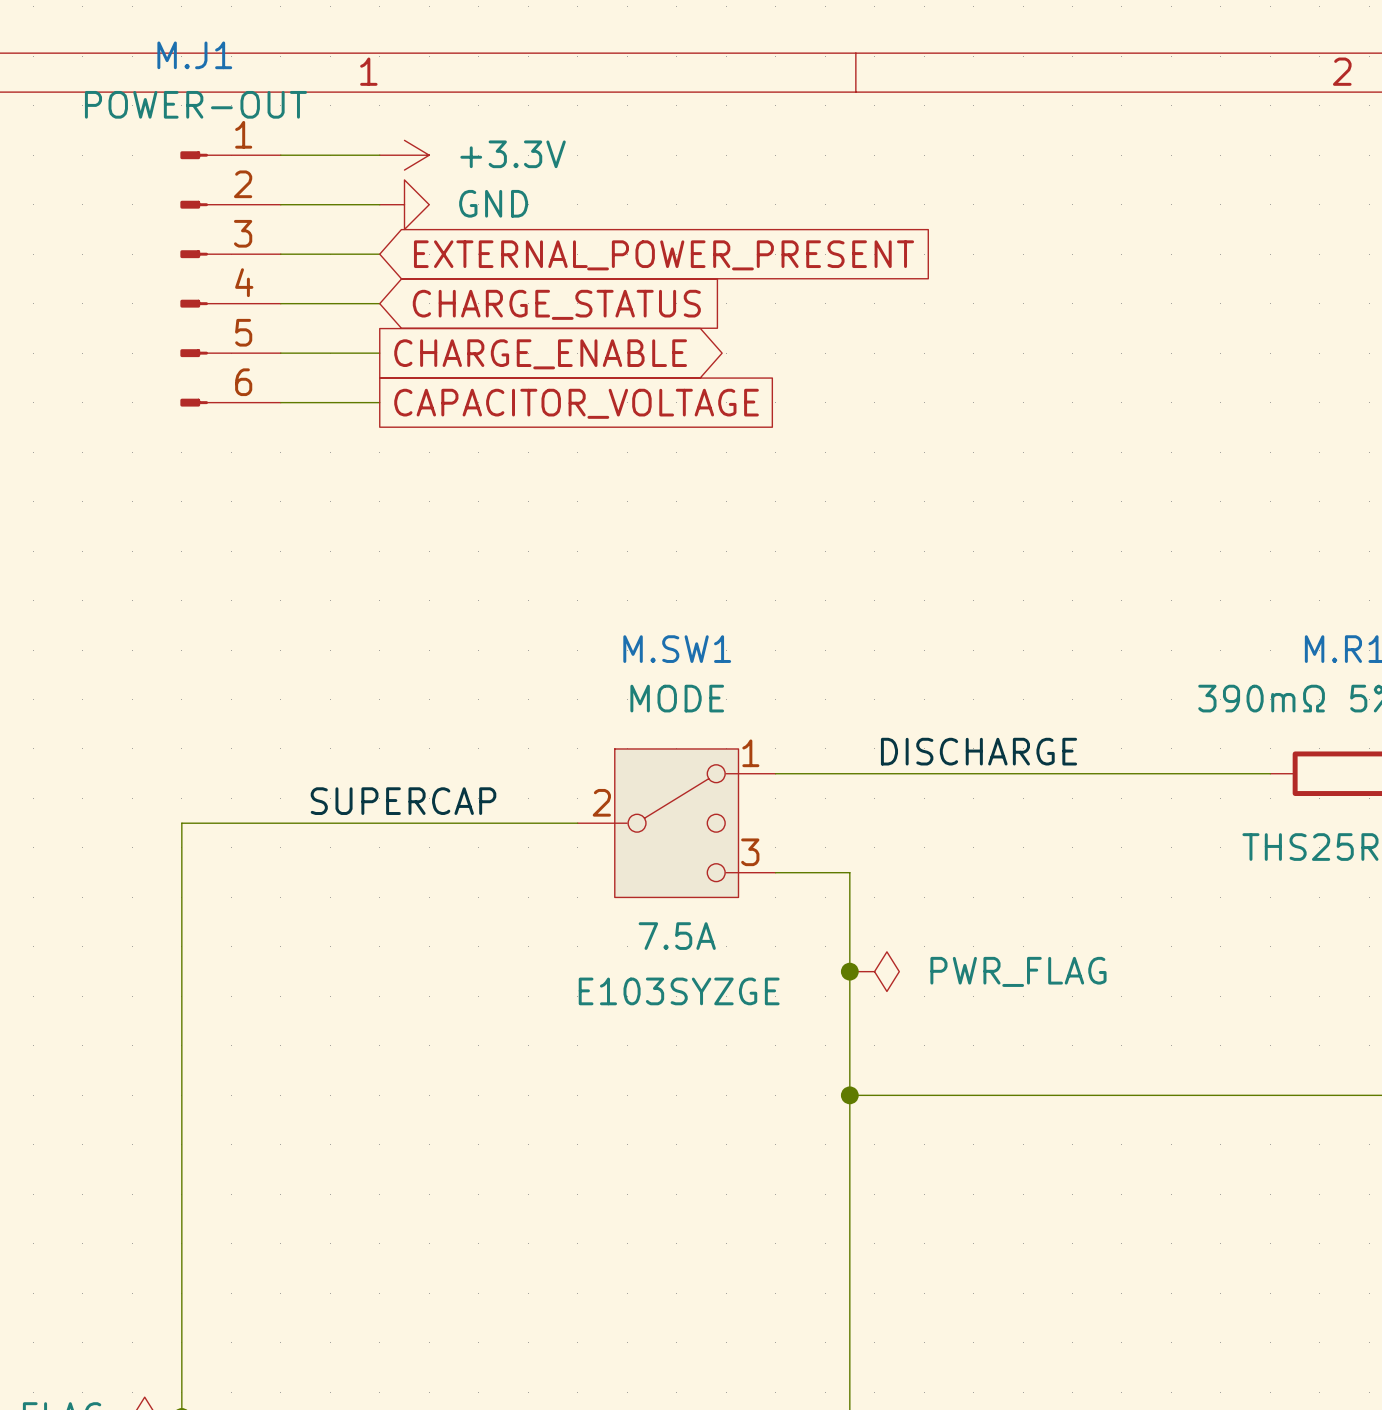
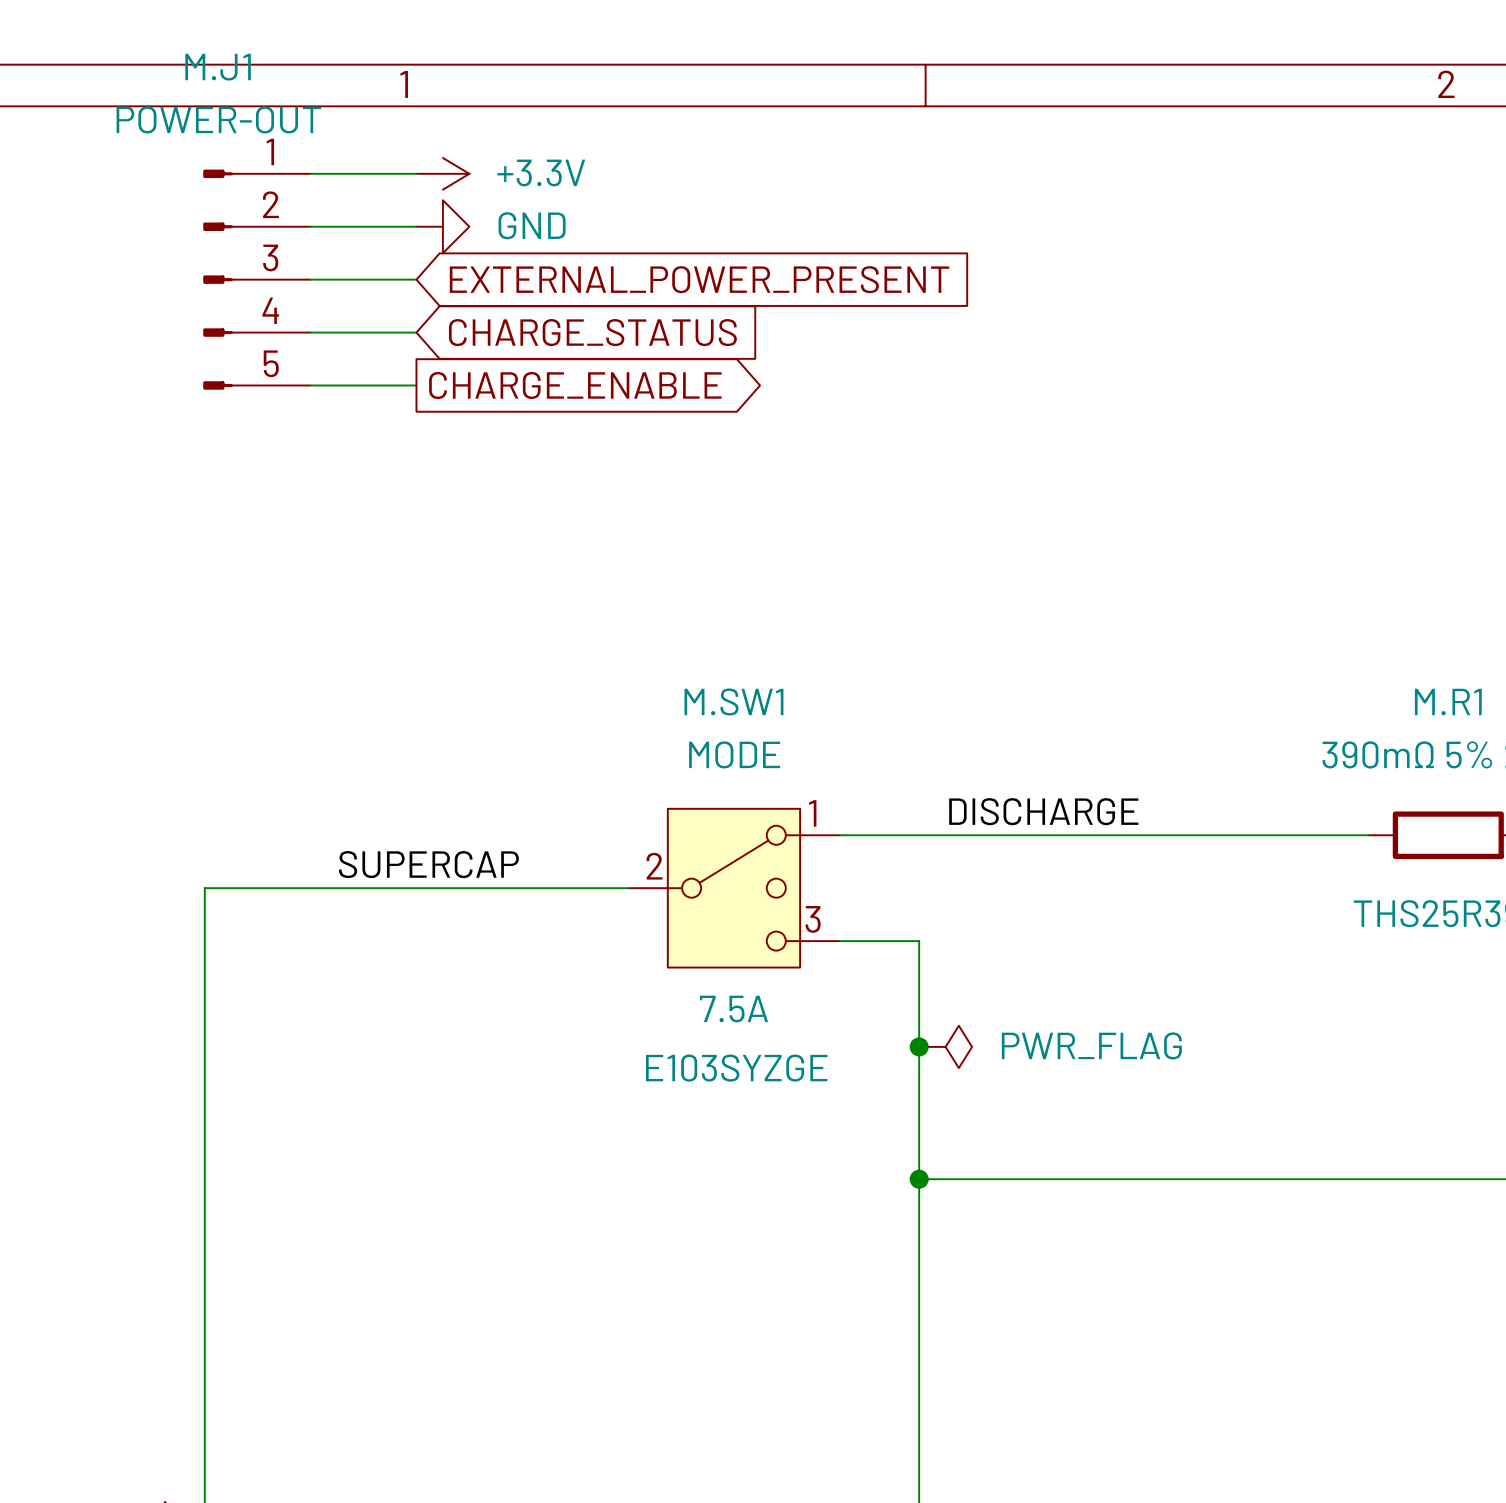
M.J1 symbol: [180, 151, 281, 407] -> [203, 169, 311, 390]
wire: (280, 402) (379, 402) -> none
global label: CAPACITOR_VOLTAGE (576, 403) -> none

